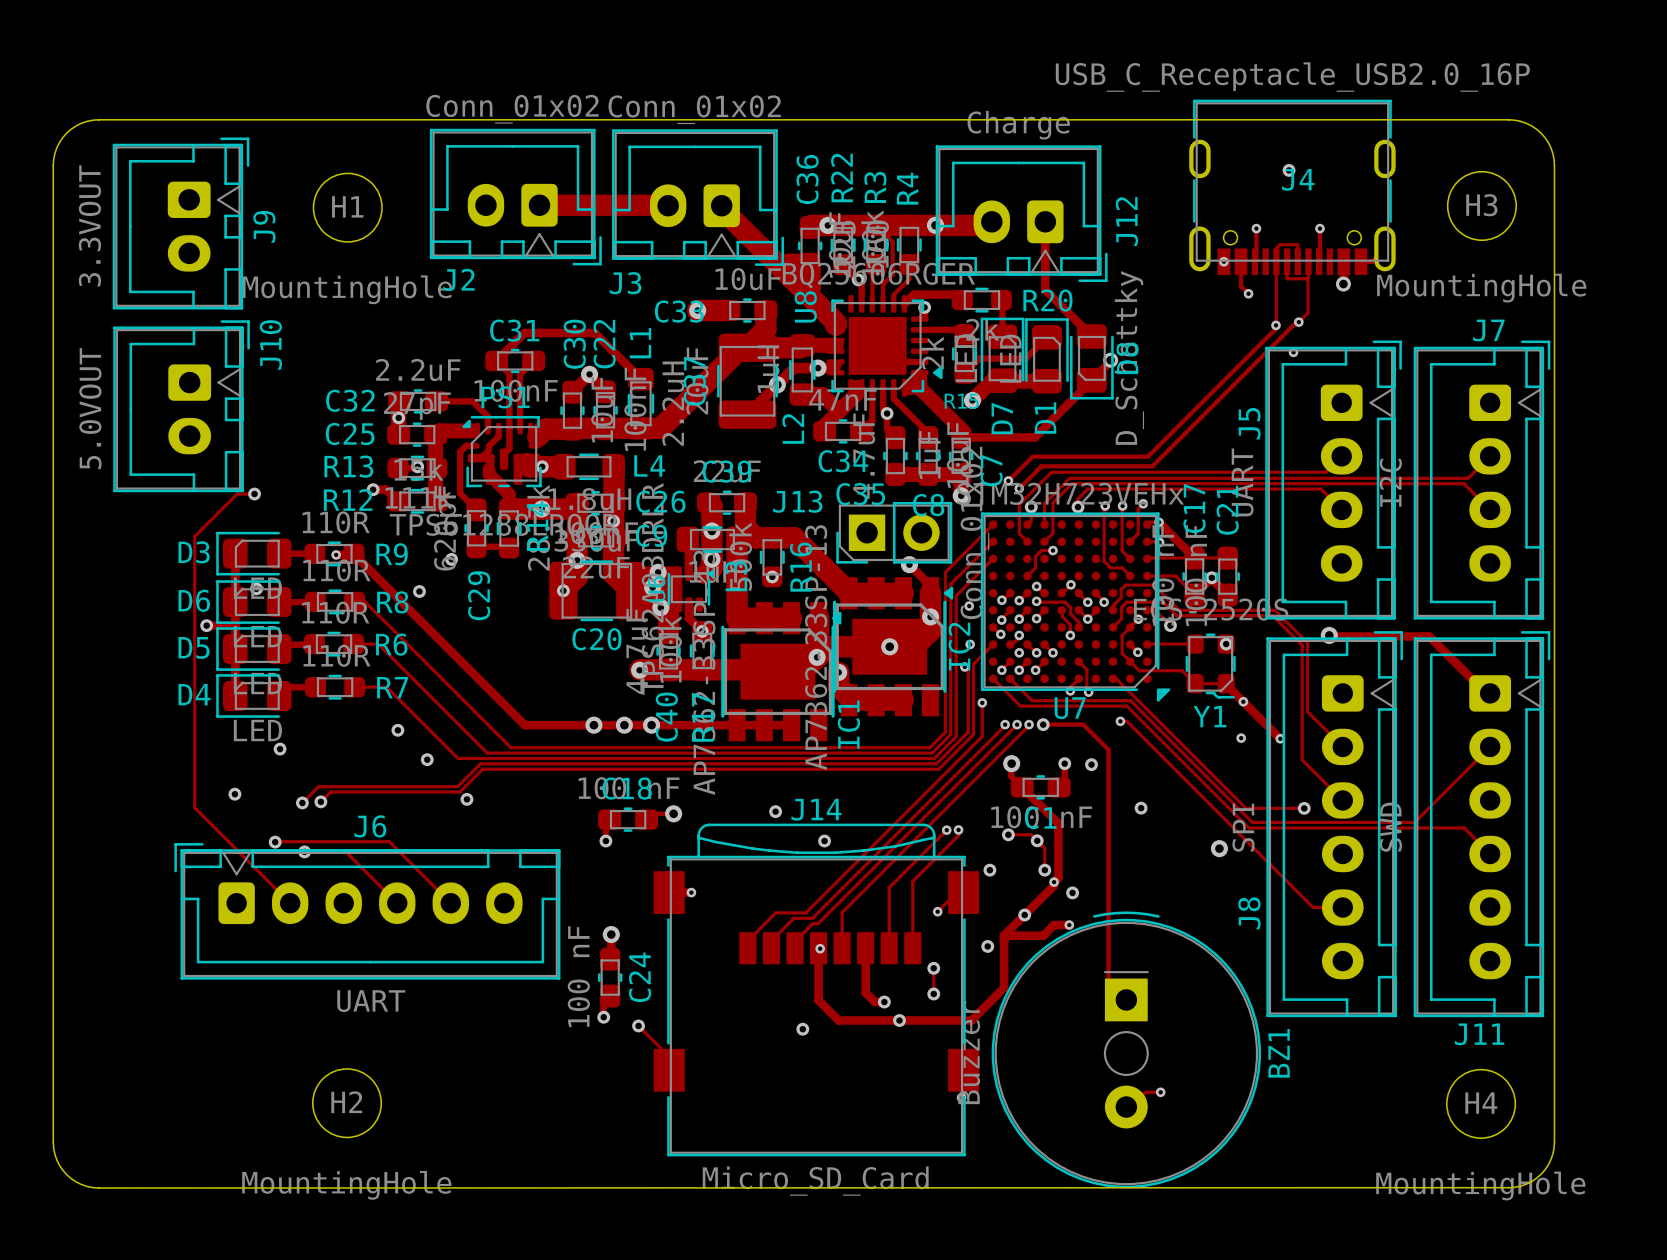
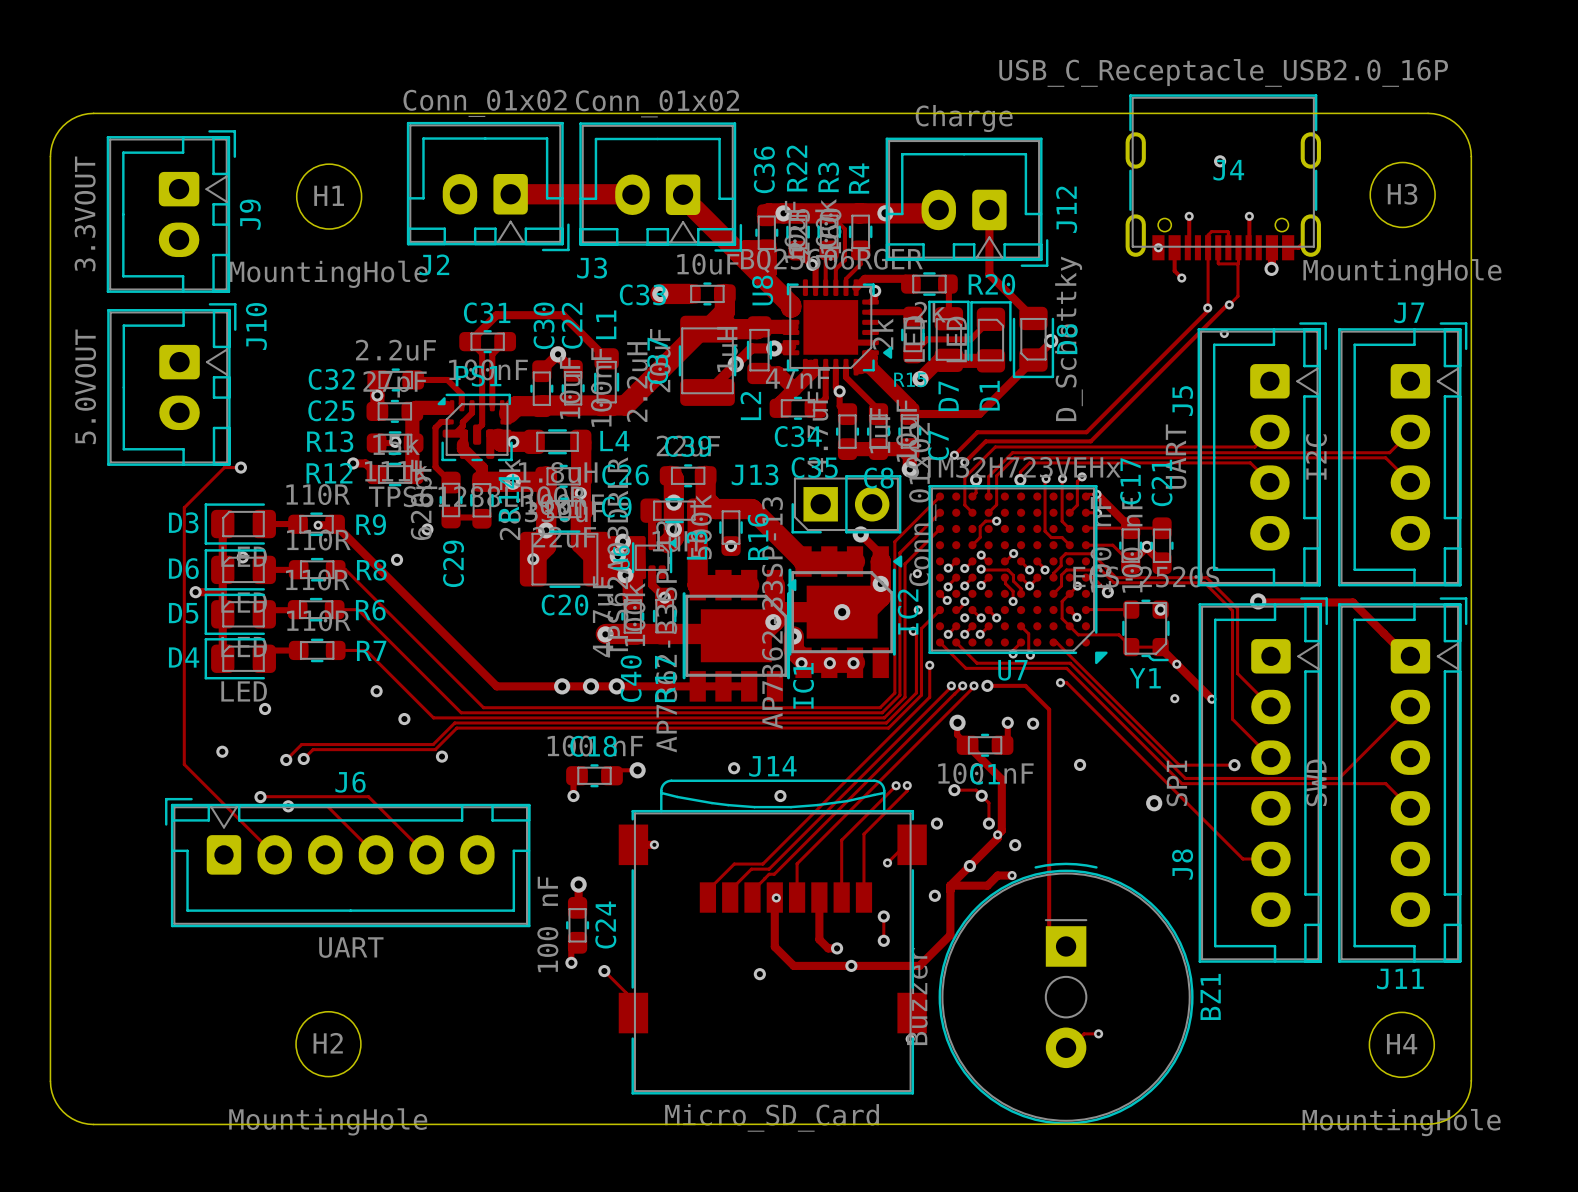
via: none -> (801, 663)
via: none -> (829, 663)
via: none -> (853, 663)

